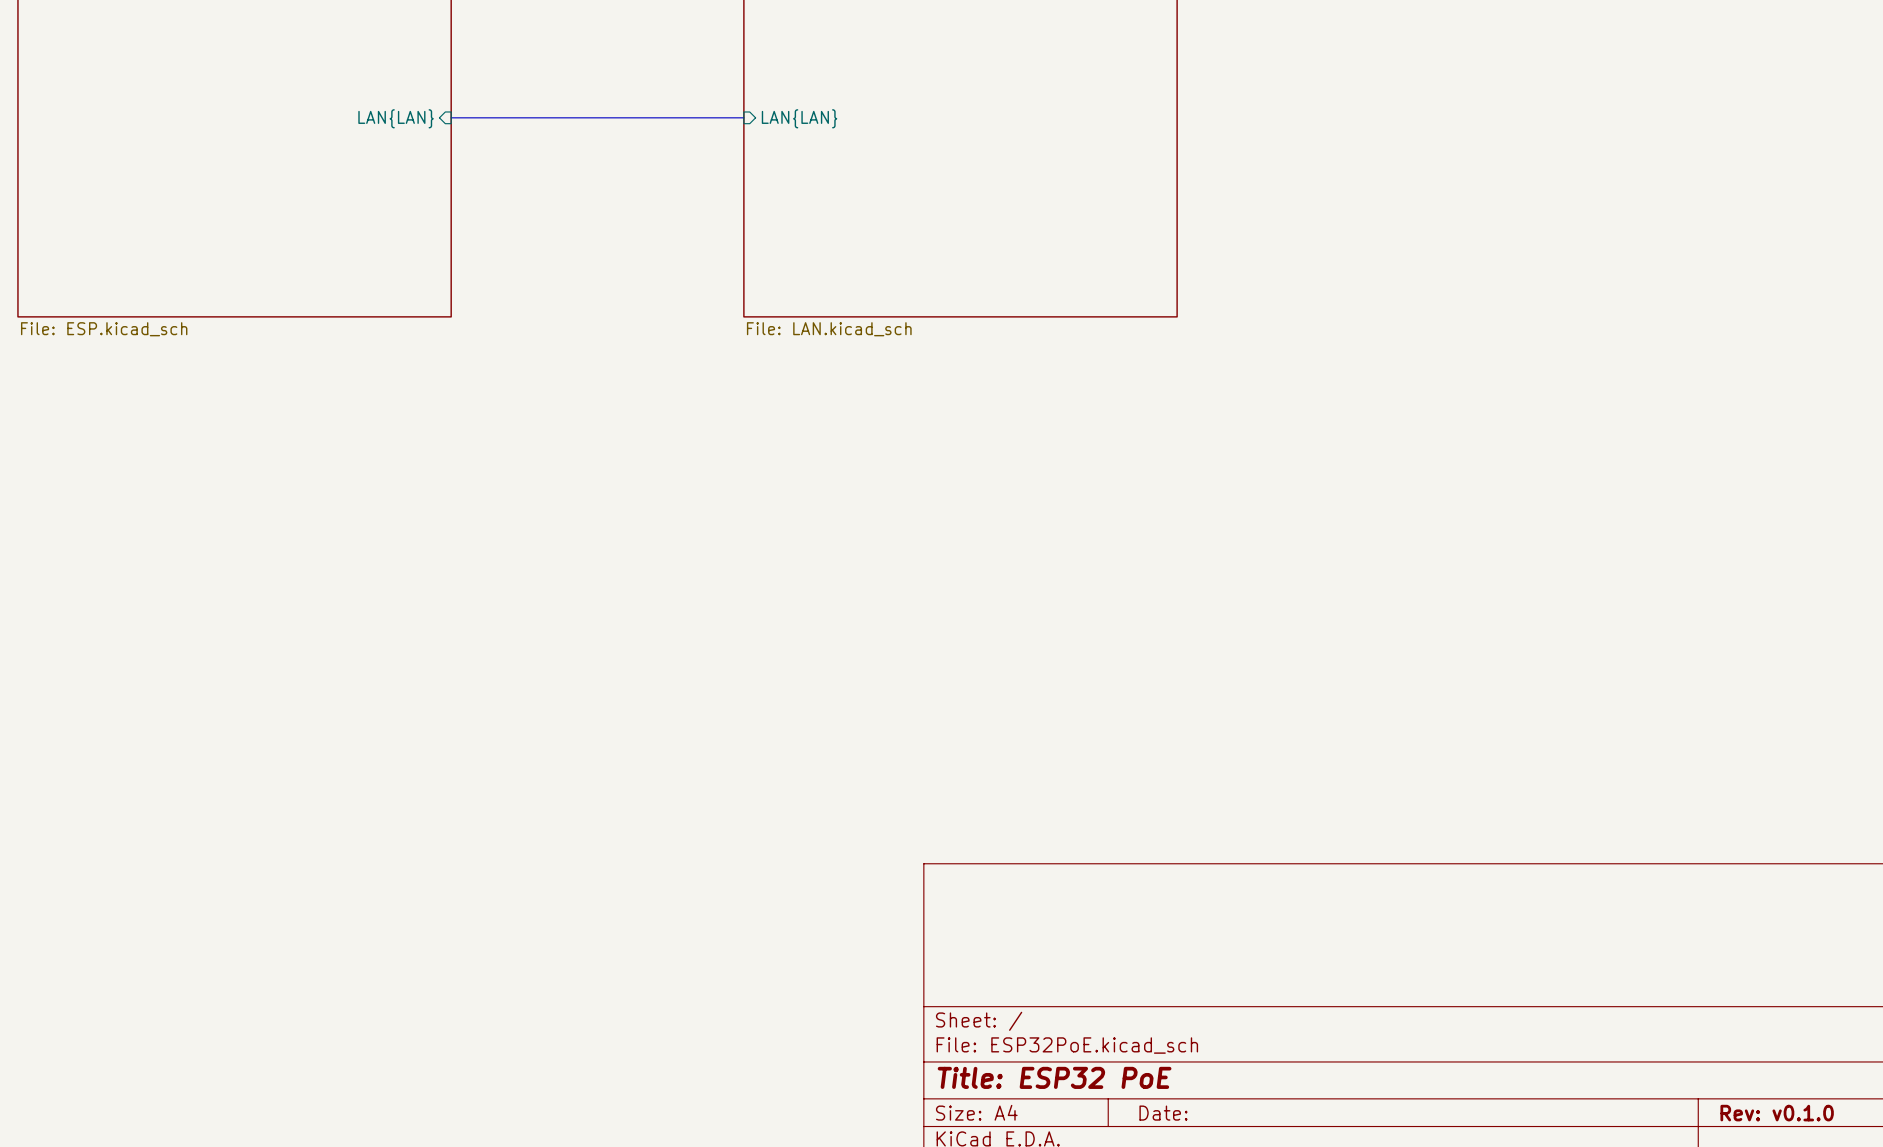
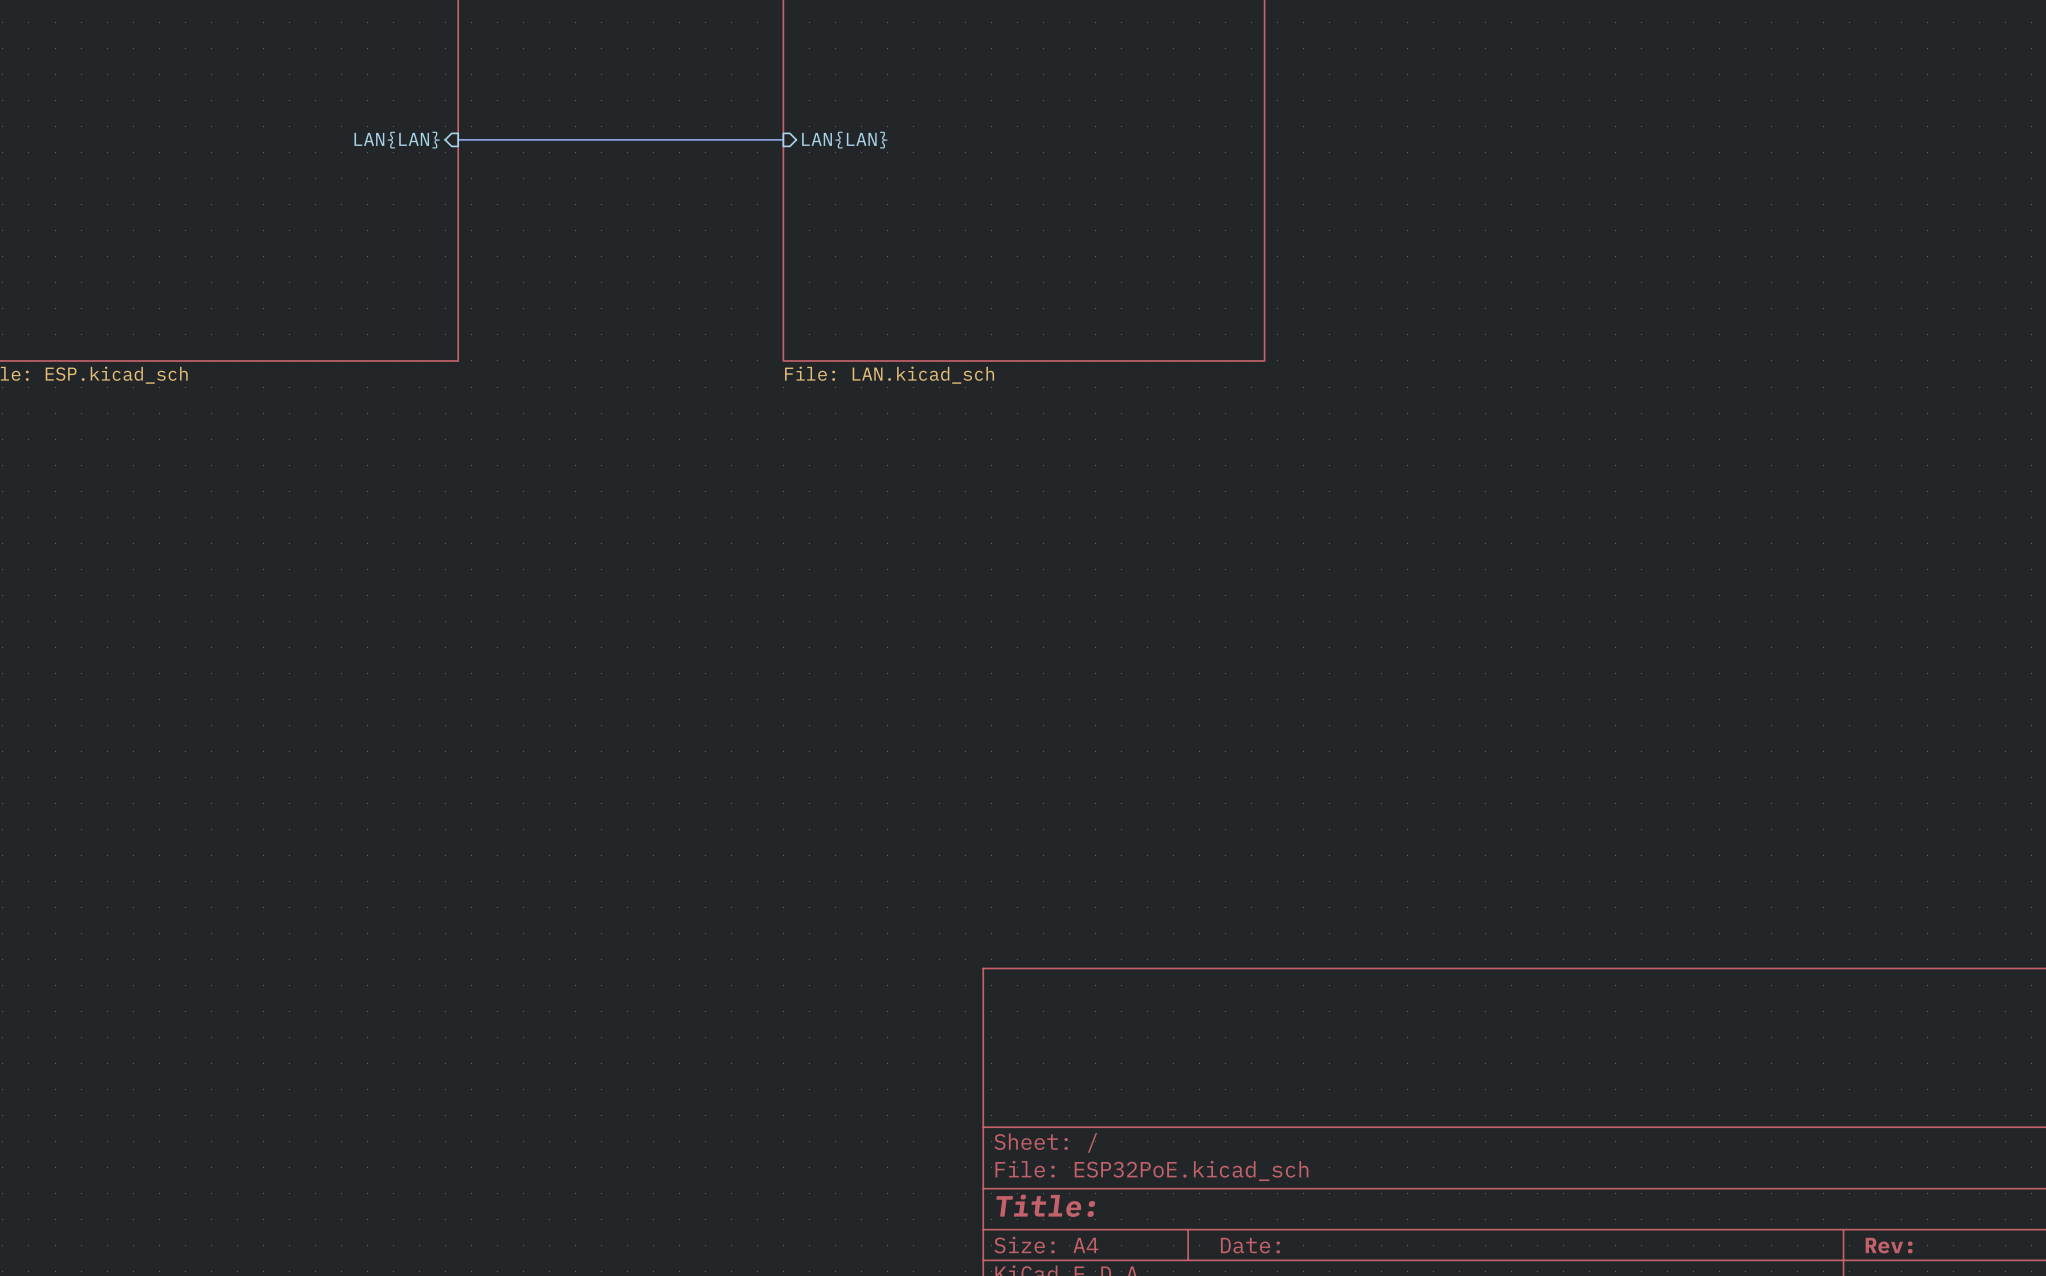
title block: Title: ESP32 PoE (1054, 1077) -> Title: (1045, 1205)
title block: Rev: v0.1.0 (1777, 1113) -> Rev: (1889, 1245)

